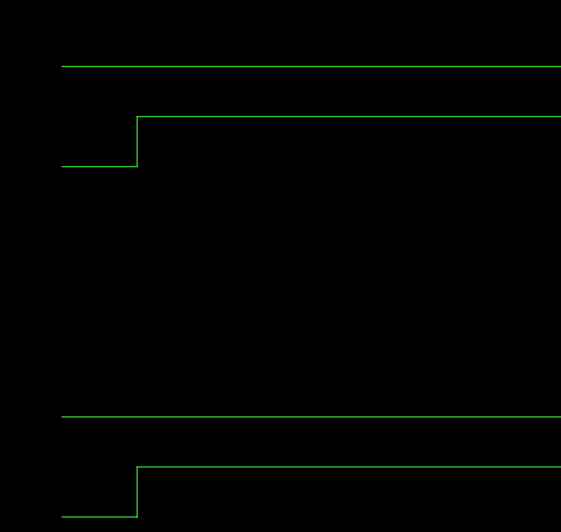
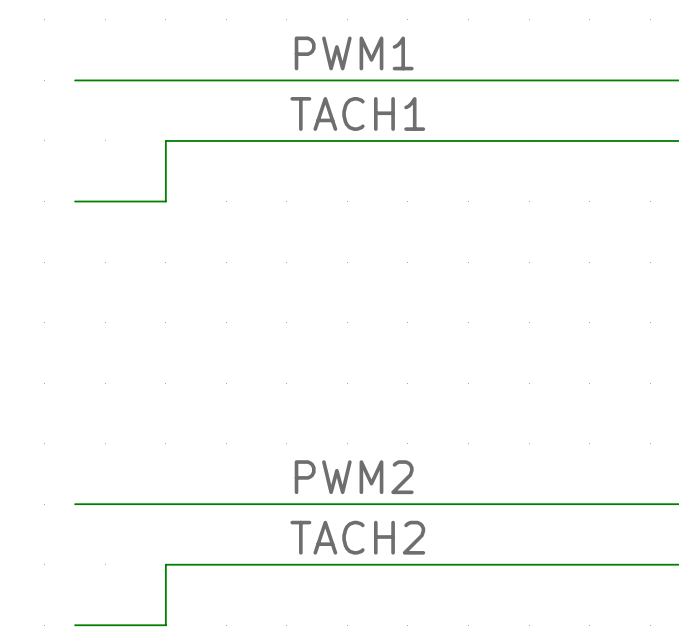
label: none -> PWM1 (354, 53)
label: none -> TACH1 (357, 113)
label: none -> PWM2 (354, 477)
label: none -> TACH2 (357, 537)

